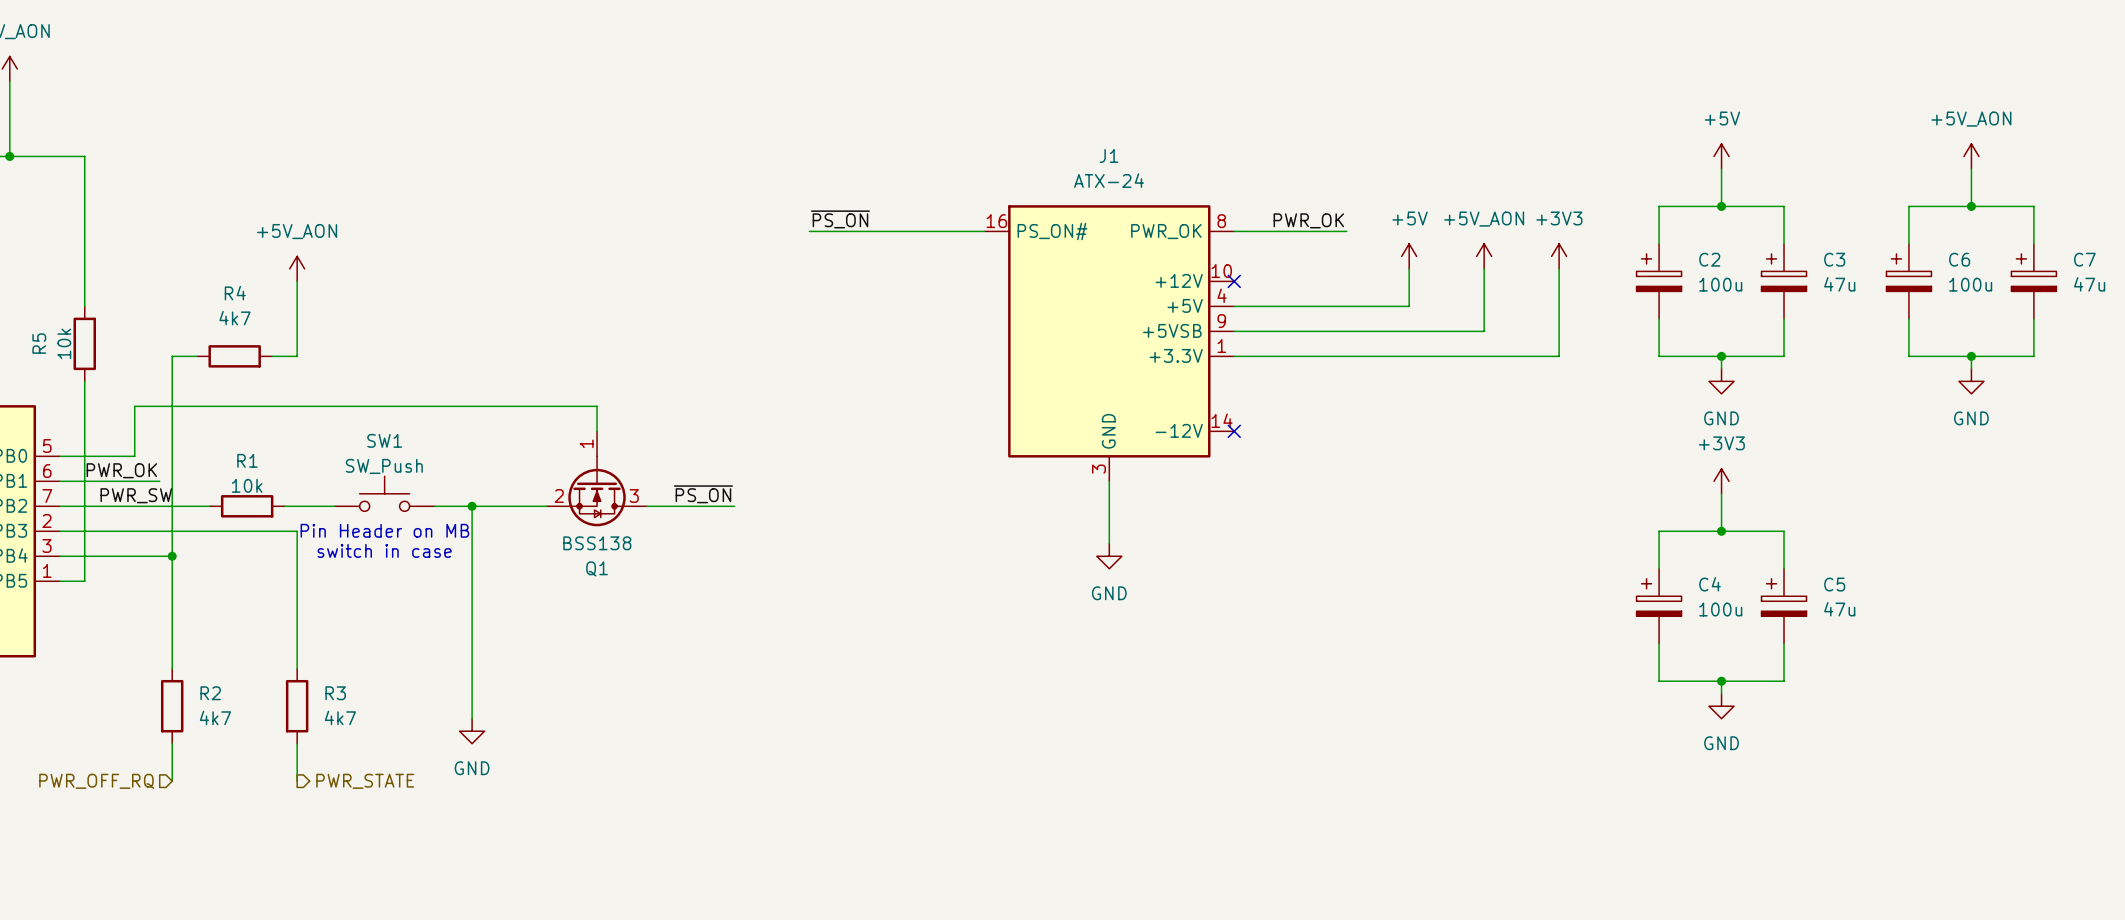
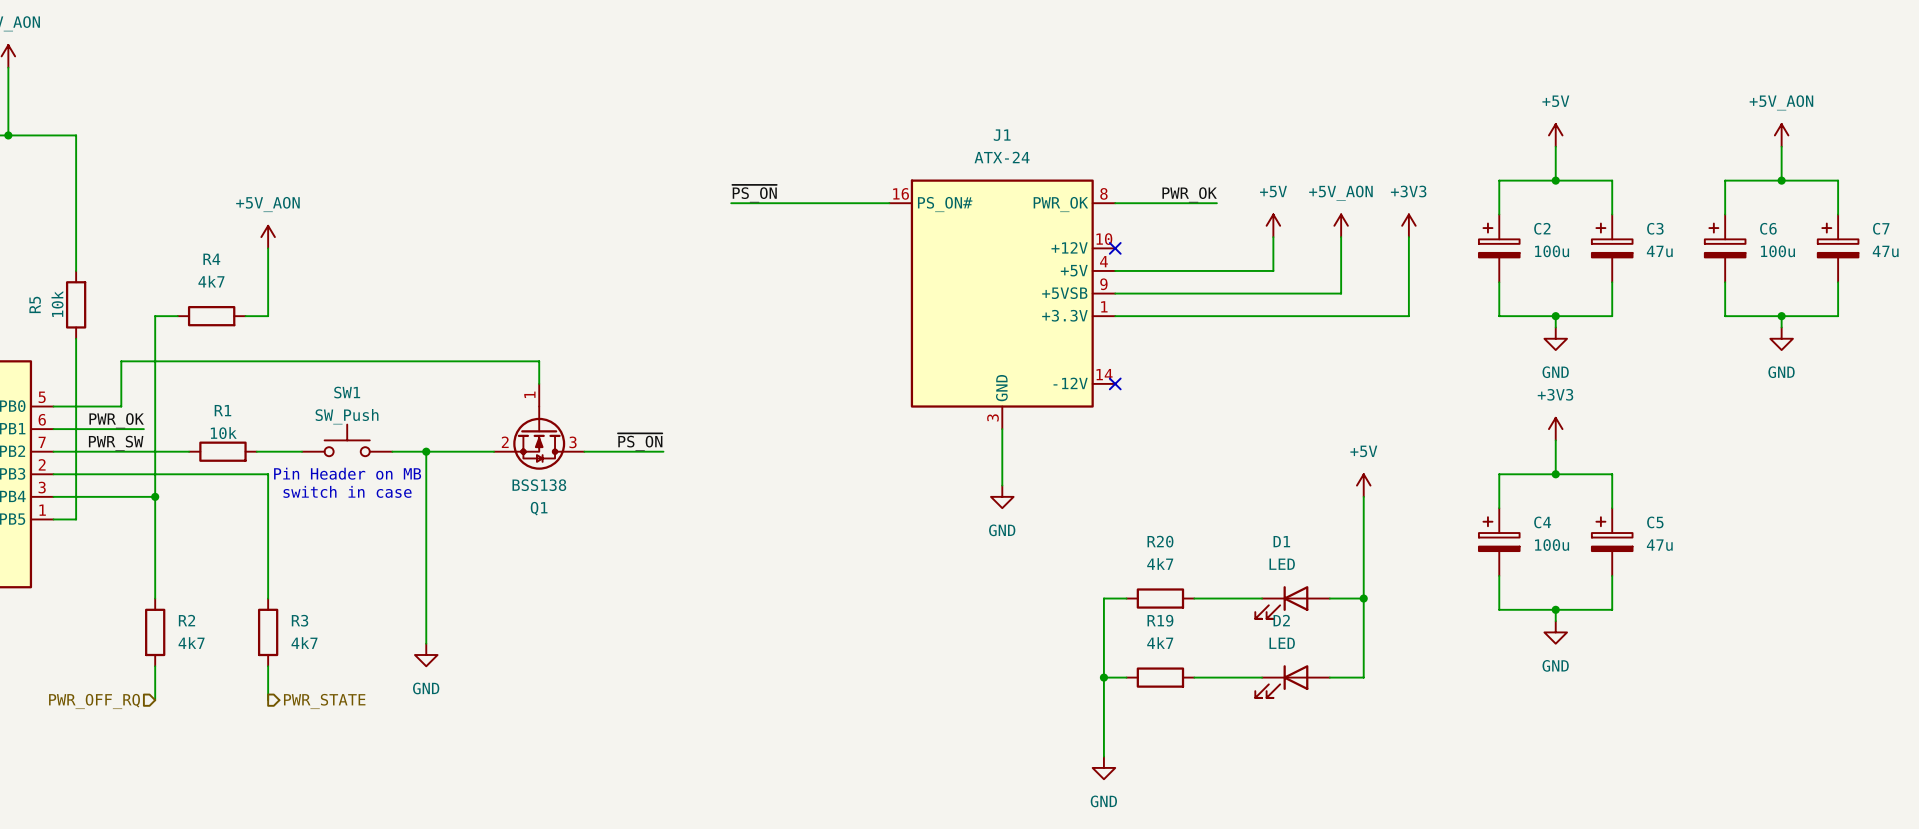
power symbol: none -> +5V (1363, 485)
wire: none -> (1363, 496) (1363, 677) (1329, 677)
wire: none -> (1126, 598) (1103, 598) (1103, 756)
R20: none -> 4k7 (1160, 598)
wire: none -> (1194, 598) (1262, 598)
wire: none -> (1329, 598) (1363, 598)
junction: none -> (1363, 598)
D1: none -> LED (1292, 602)
wire: none -> (1103, 677) (1126, 677)
junction: none -> (1103, 677)
R19: none -> 4k7 (1160, 677)
wire: none -> (1194, 677) (1262, 677)
D2: none -> LED (1292, 681)
power symbol: none -> GND (1103, 767)

